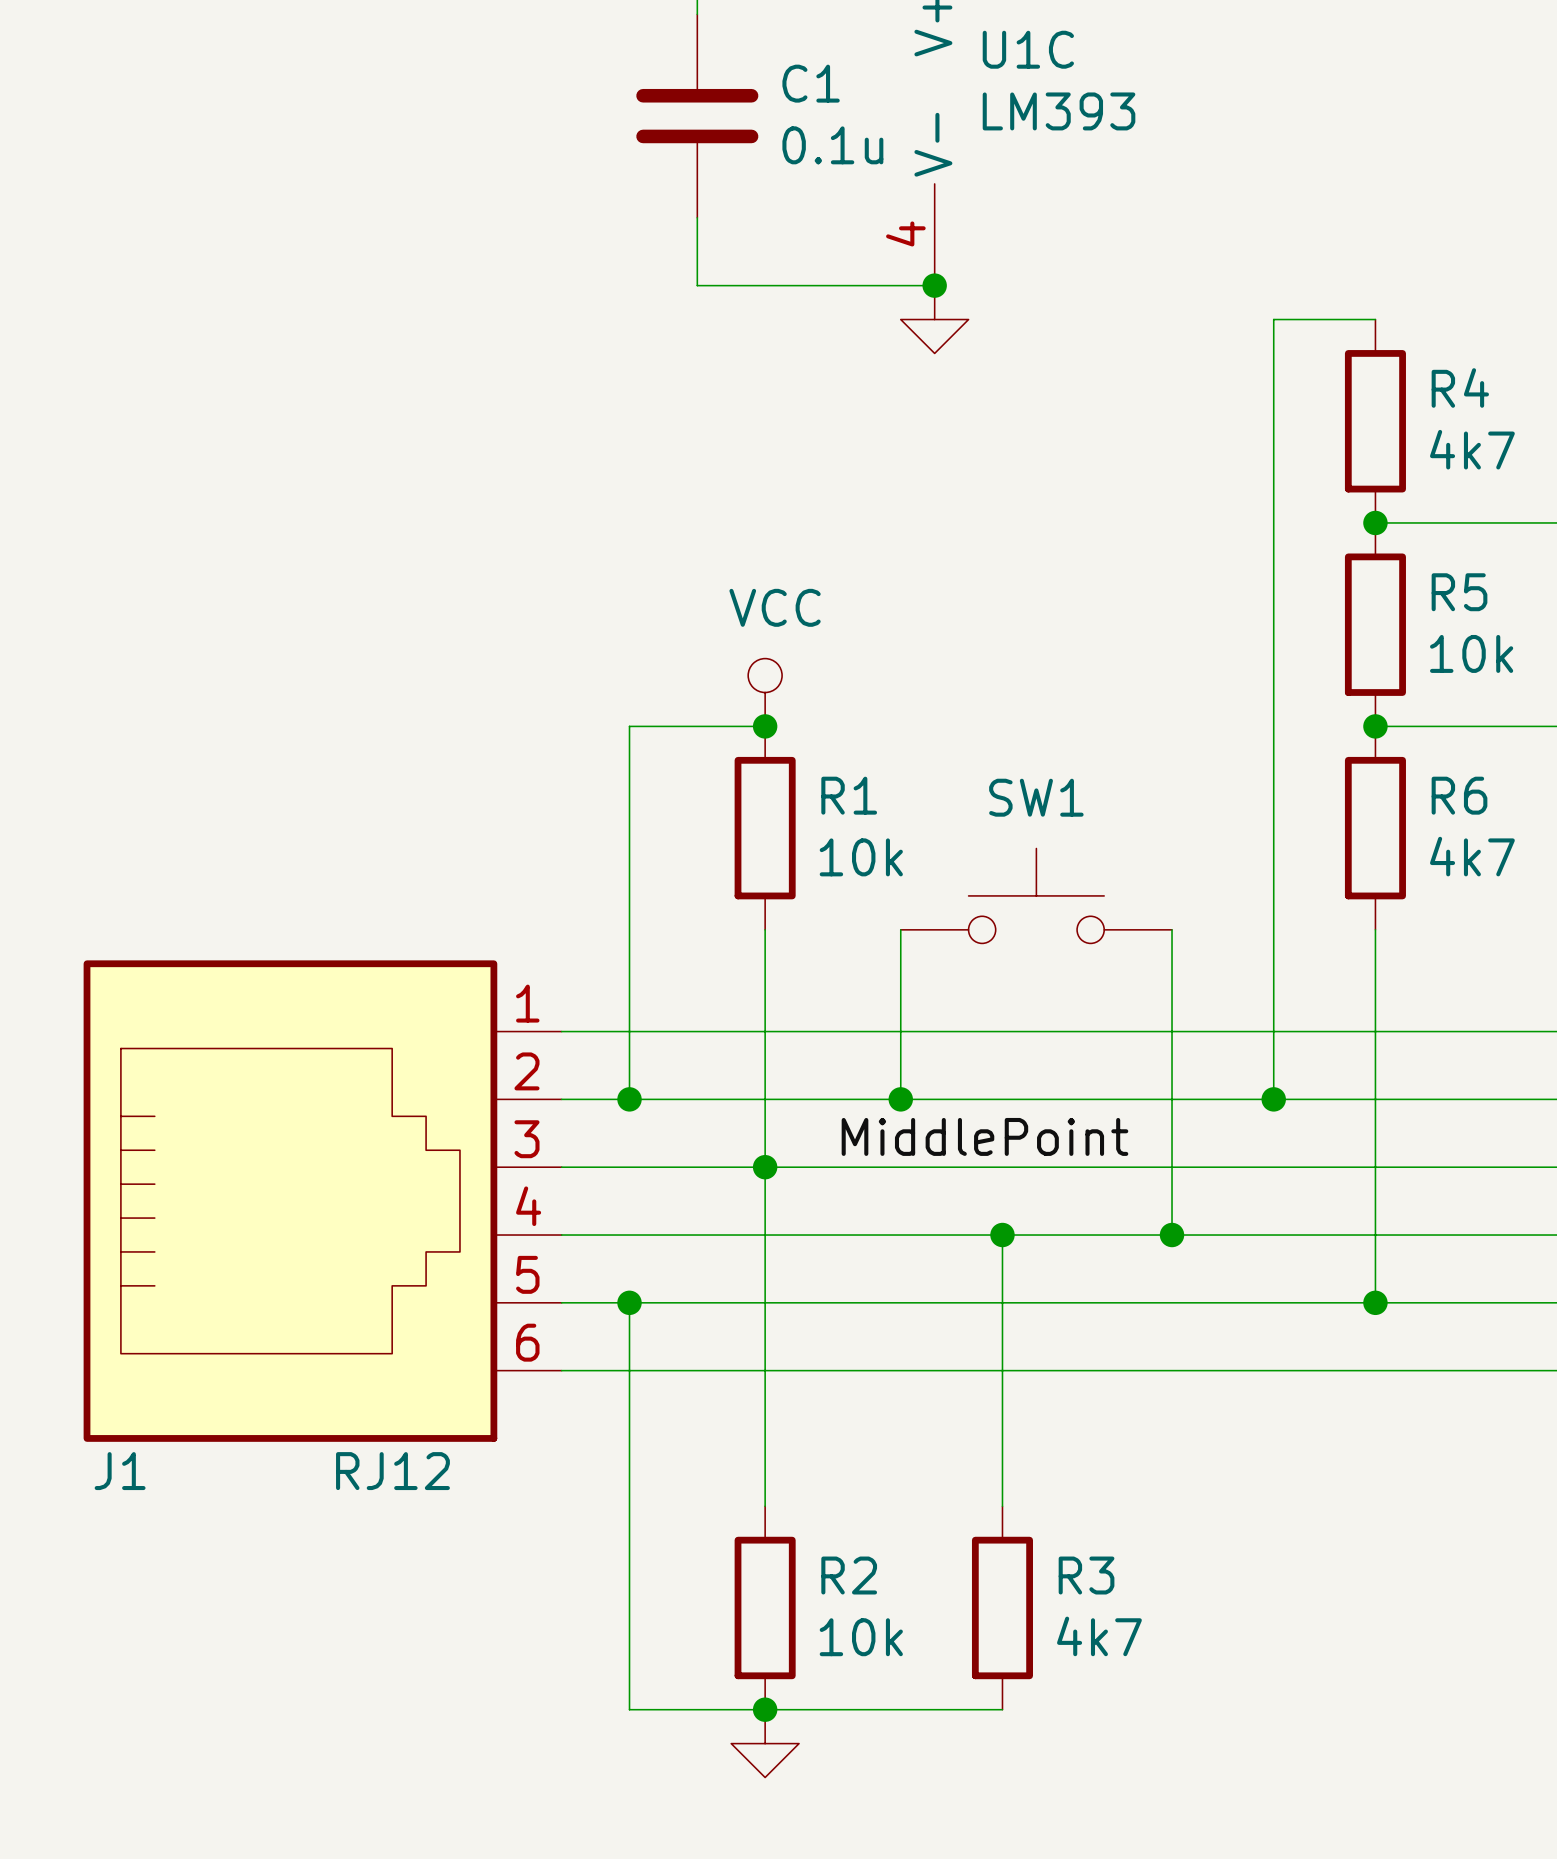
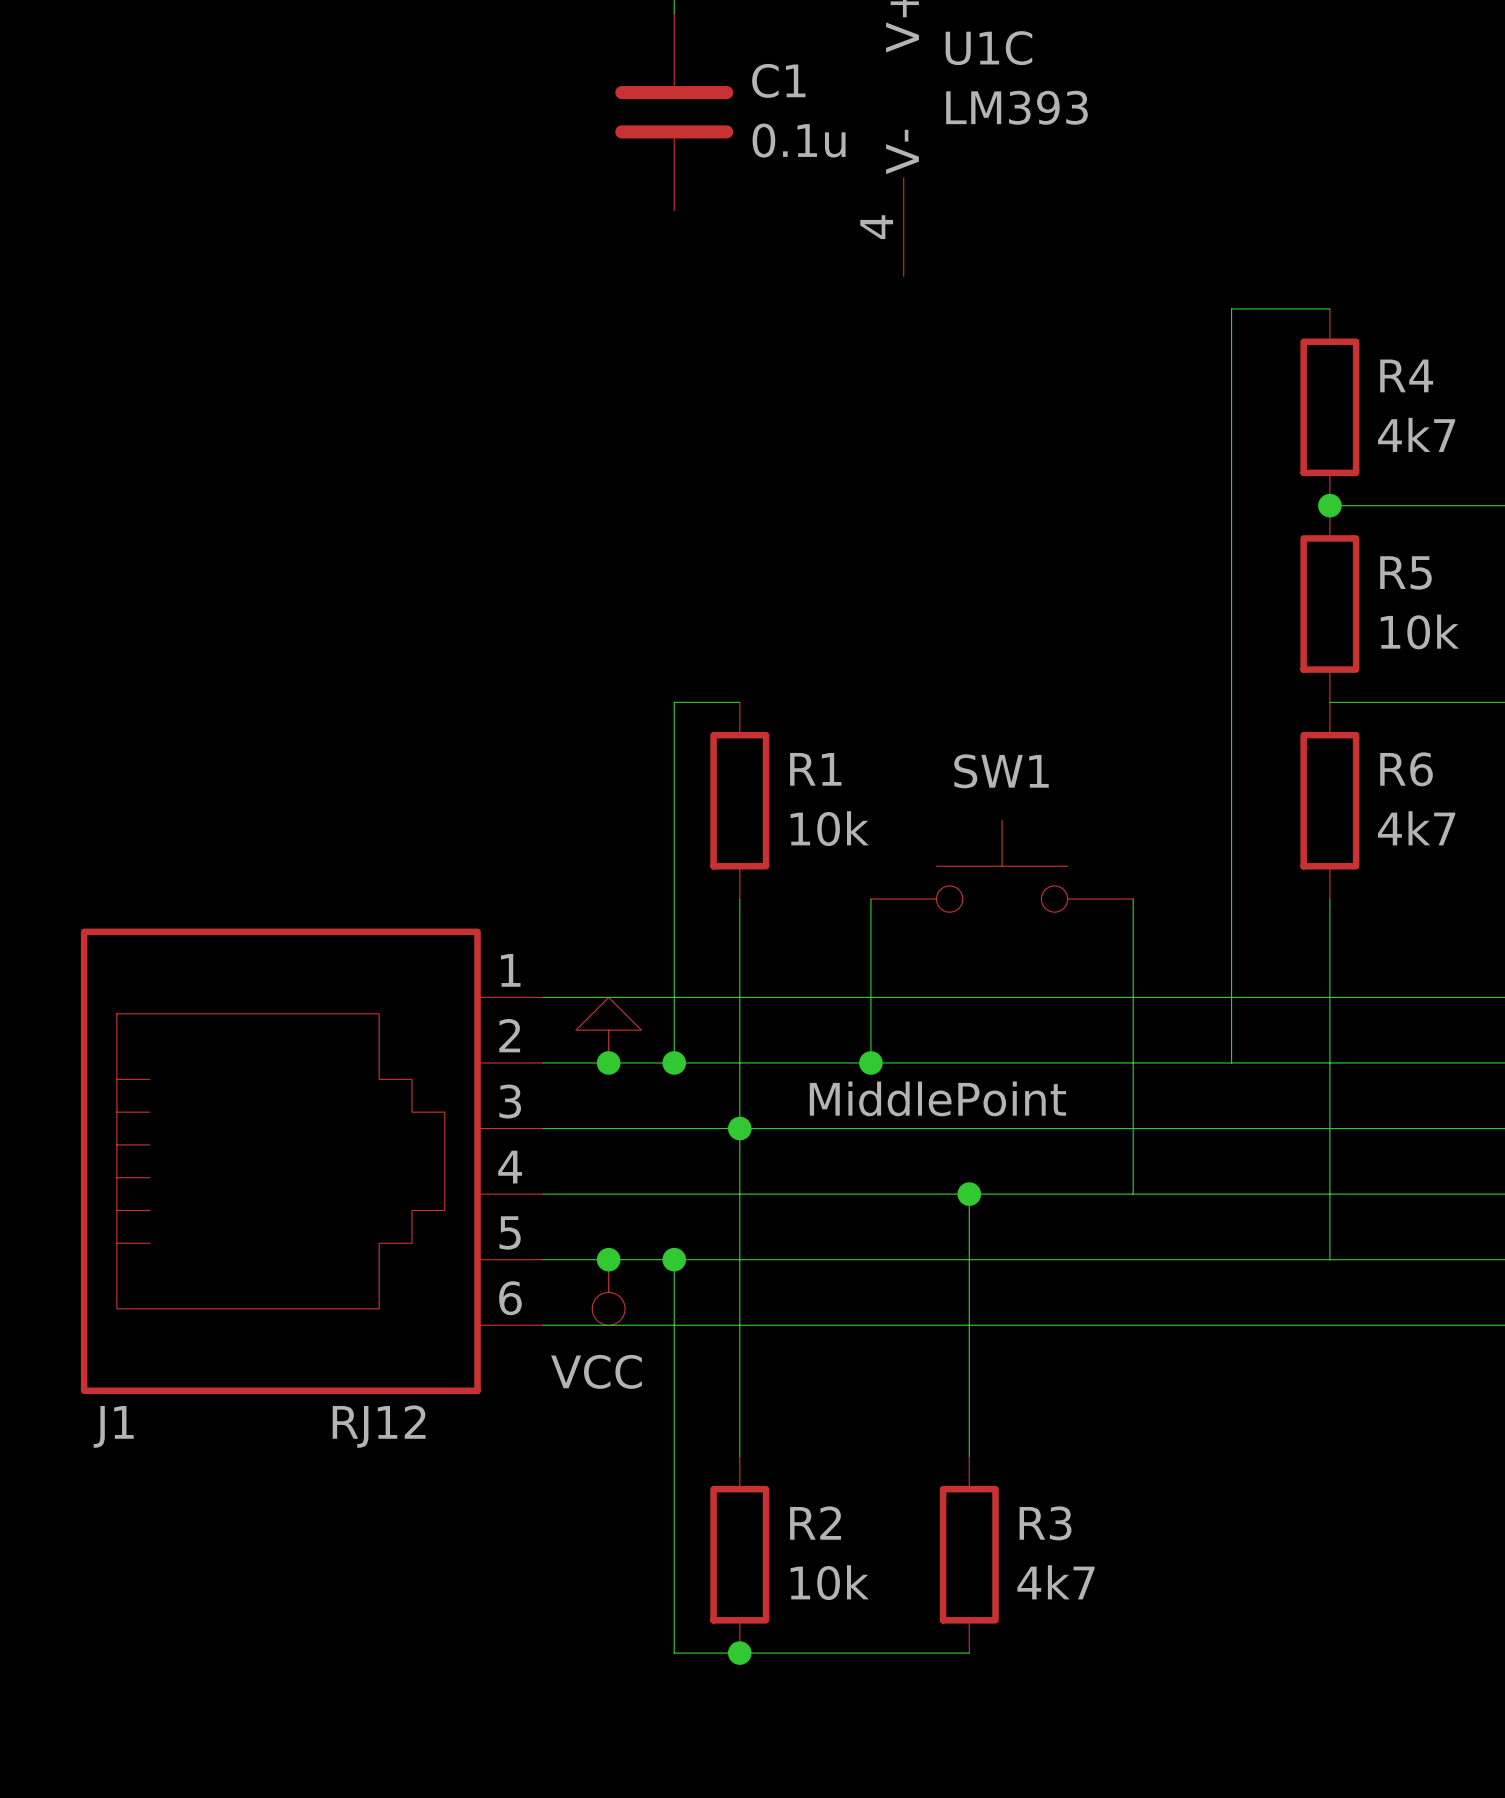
wire: (697, 217) (697, 285) (934, 285) -> none
junction: (934, 285) -> none
power symbol: (934, 319) -> none
power symbol: VCC (765, 692) -> none
wire: (697, 726) (629, 726) (629, 1099) -> (674, 702) (674, 1062)
junction: (765, 726) -> none
junction: (1375, 726) -> none
power symbol: none -> (608, 1030)
junction: none -> (674, 1062)
junction: (1273, 1099) -> none
junction: (1172, 1235) -> none
wire: (629, 1302) (629, 1709) (697, 1709) -> (674, 1259) (674, 1653)
junction: none -> (674, 1259)
junction: (1375, 1302) -> none
power symbol: none -> VCC (608, 1292)
power symbol: (765, 1743) -> none

